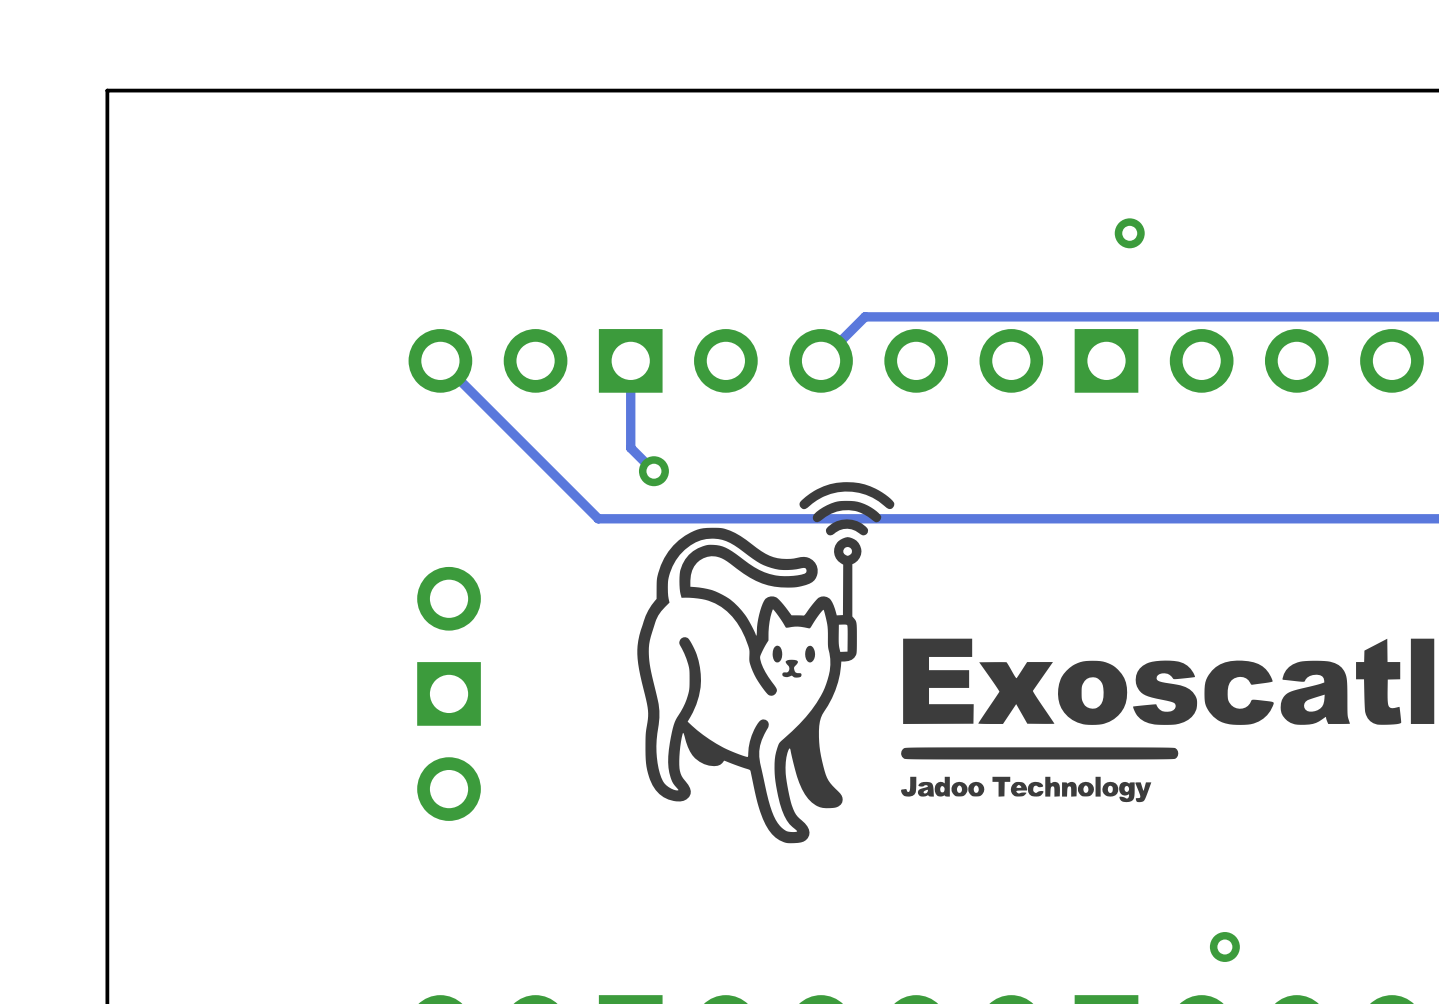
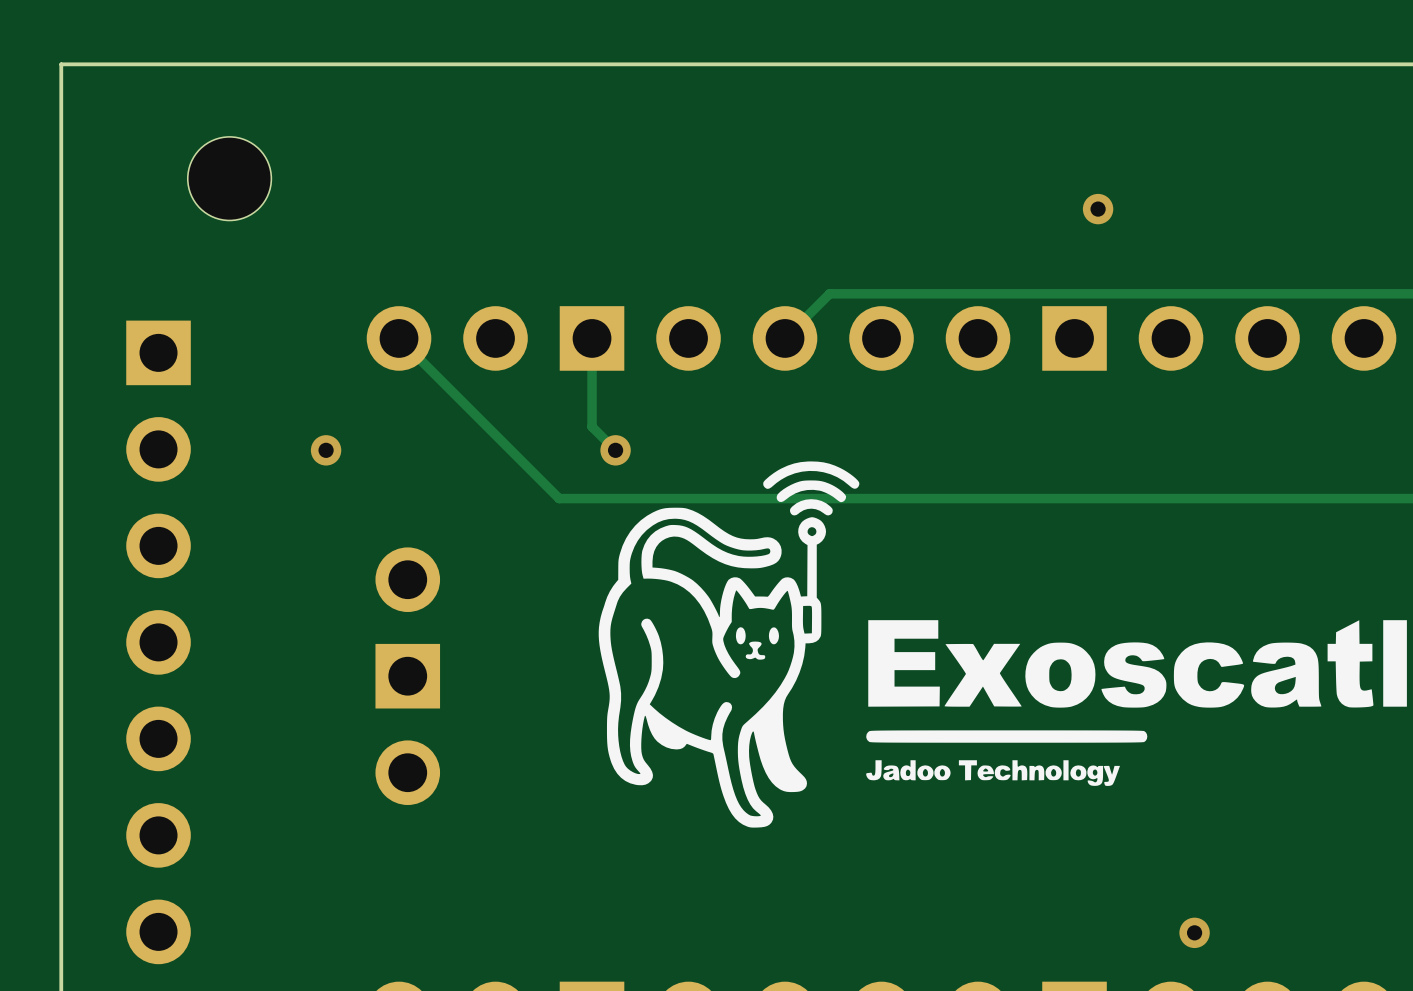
part: none -> (229, 178)
via: none -> (326, 450)
part: none -> (158, 642)

